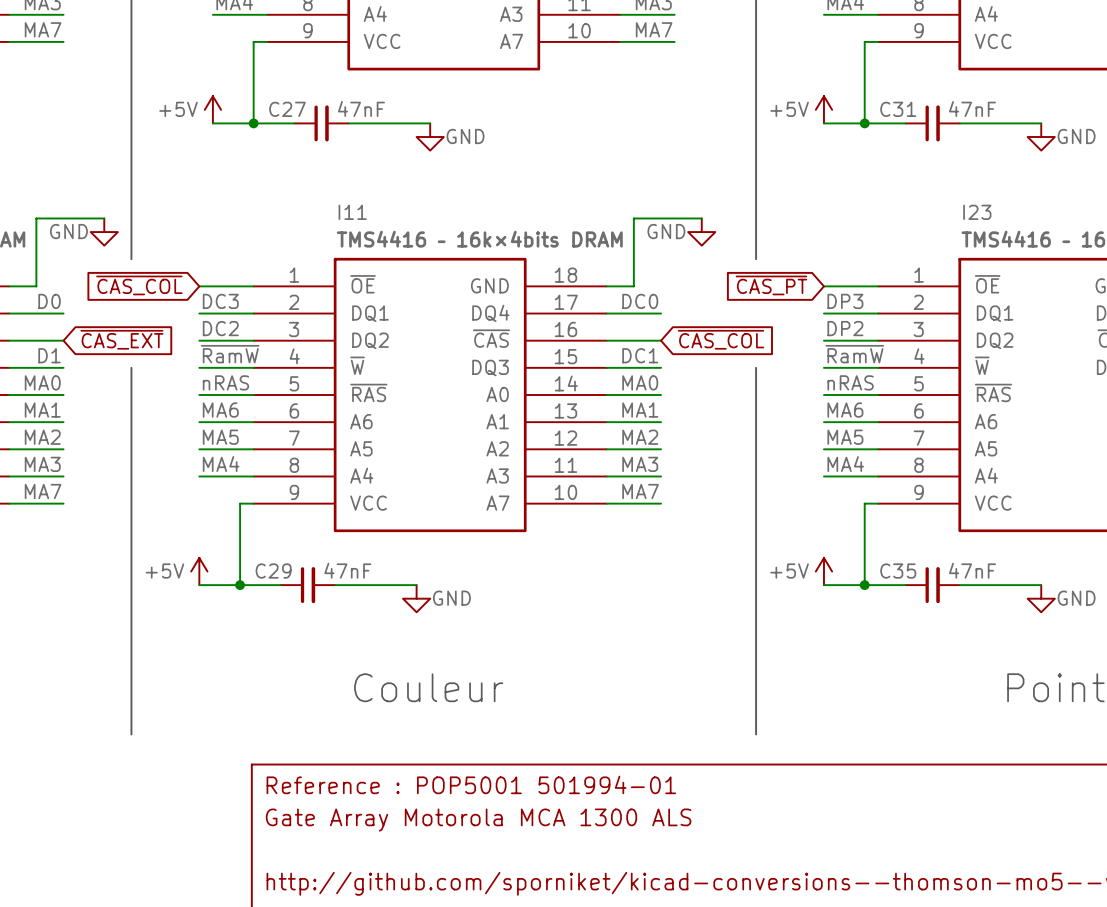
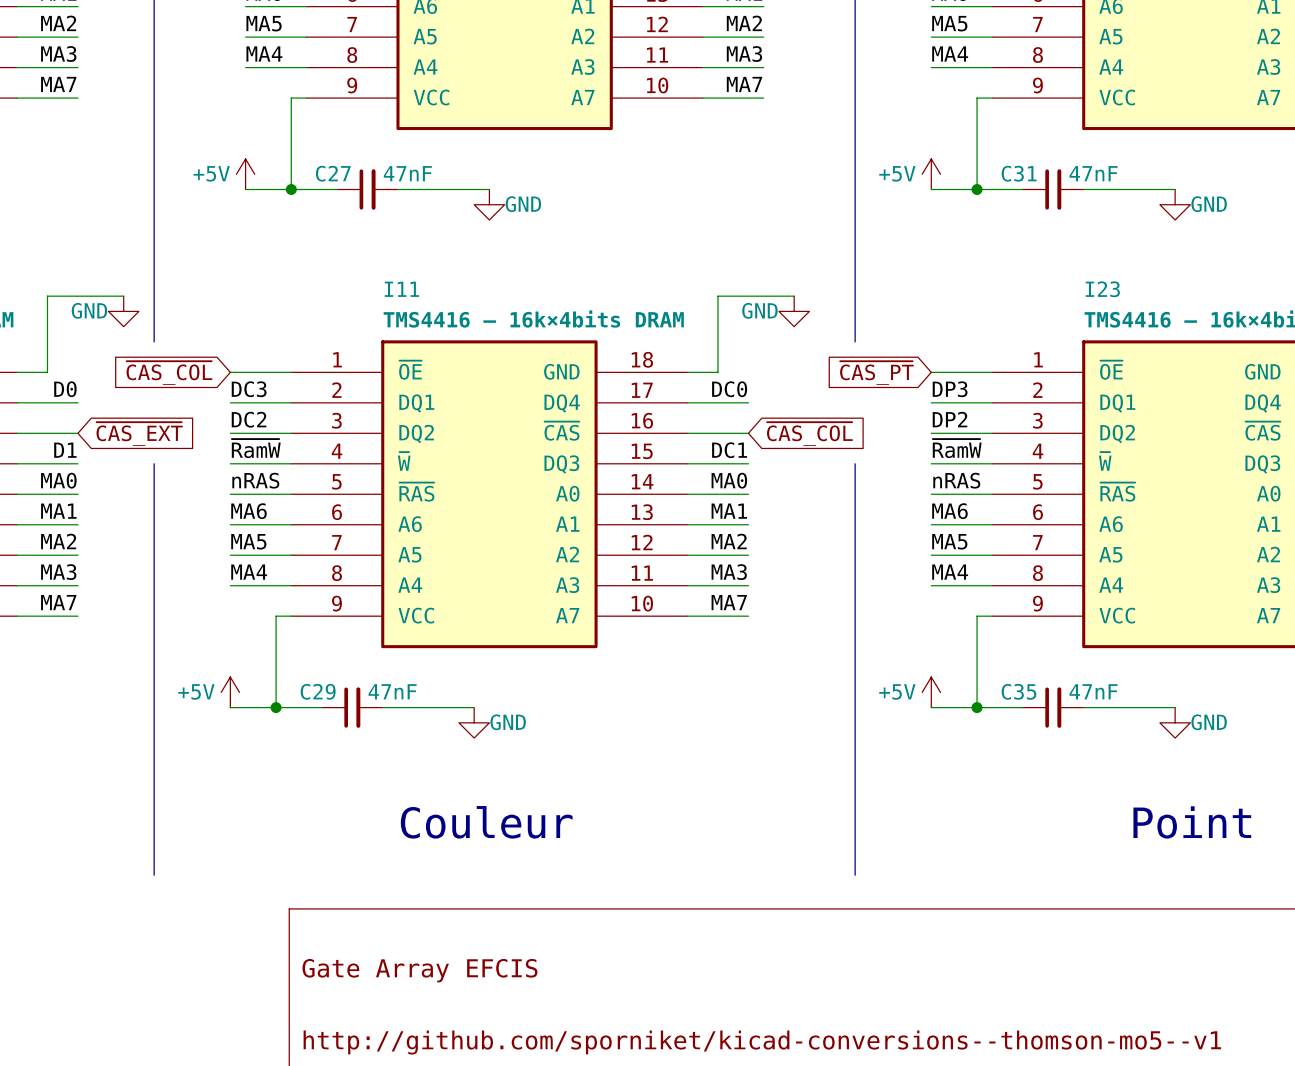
title block: Reference : POP5001 501994-01 (471, 784) -> none
title block: Gate Array Motorola MCA 1300 ALS (478, 820) -> Gate Array EFCIS (419, 970)

